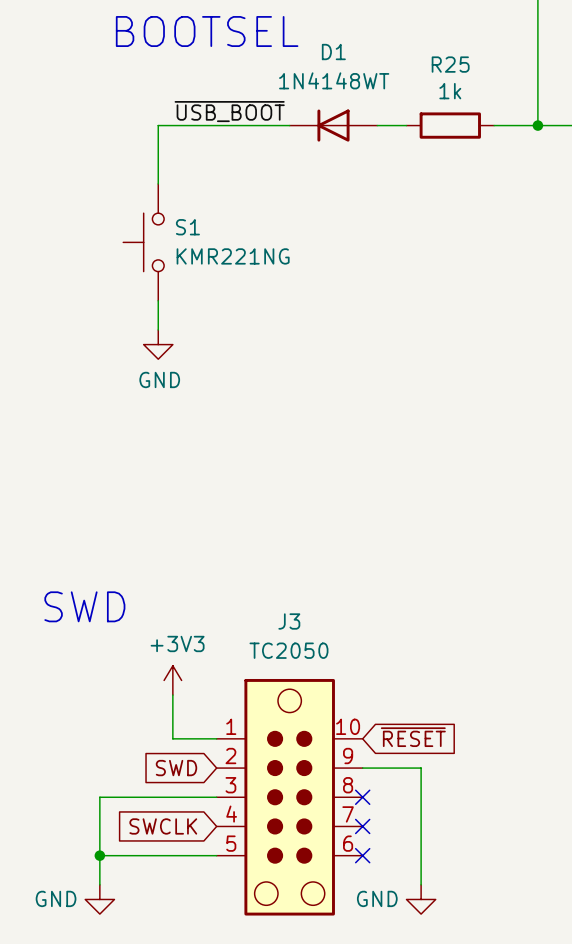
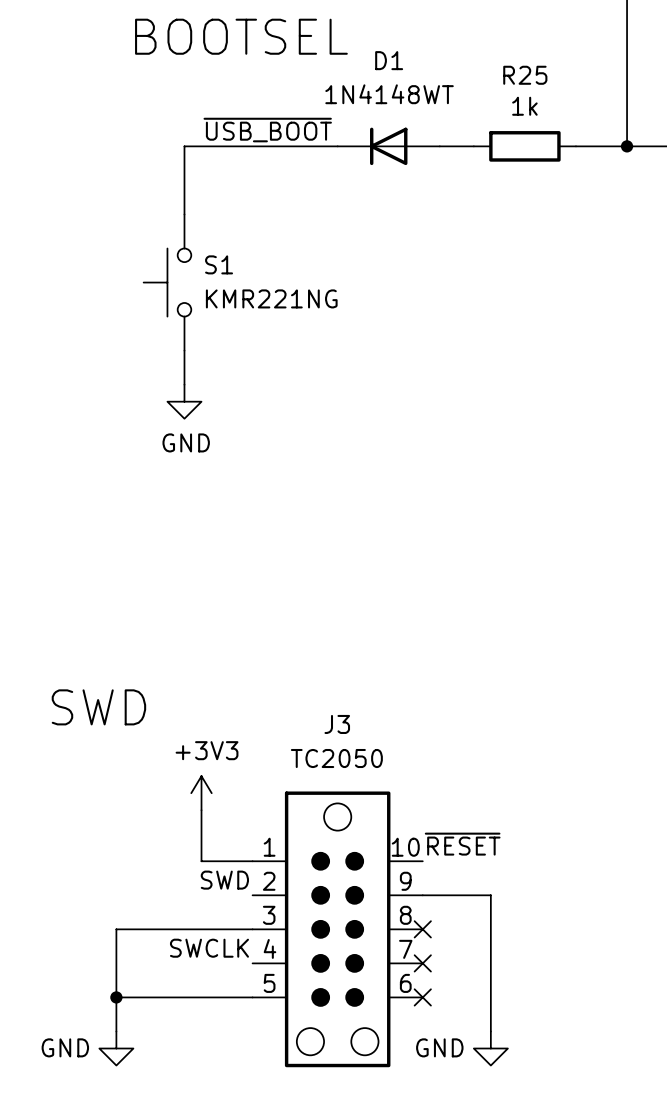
label: none -> ~{RESET} (462, 844)
global label: ~{RESET} (413, 737) -> none
label: none -> SWD (224, 880)
global label: SWD (176, 768) -> none
label: none -> SWCLK (209, 948)
global label: SWCLK (163, 826) -> none

